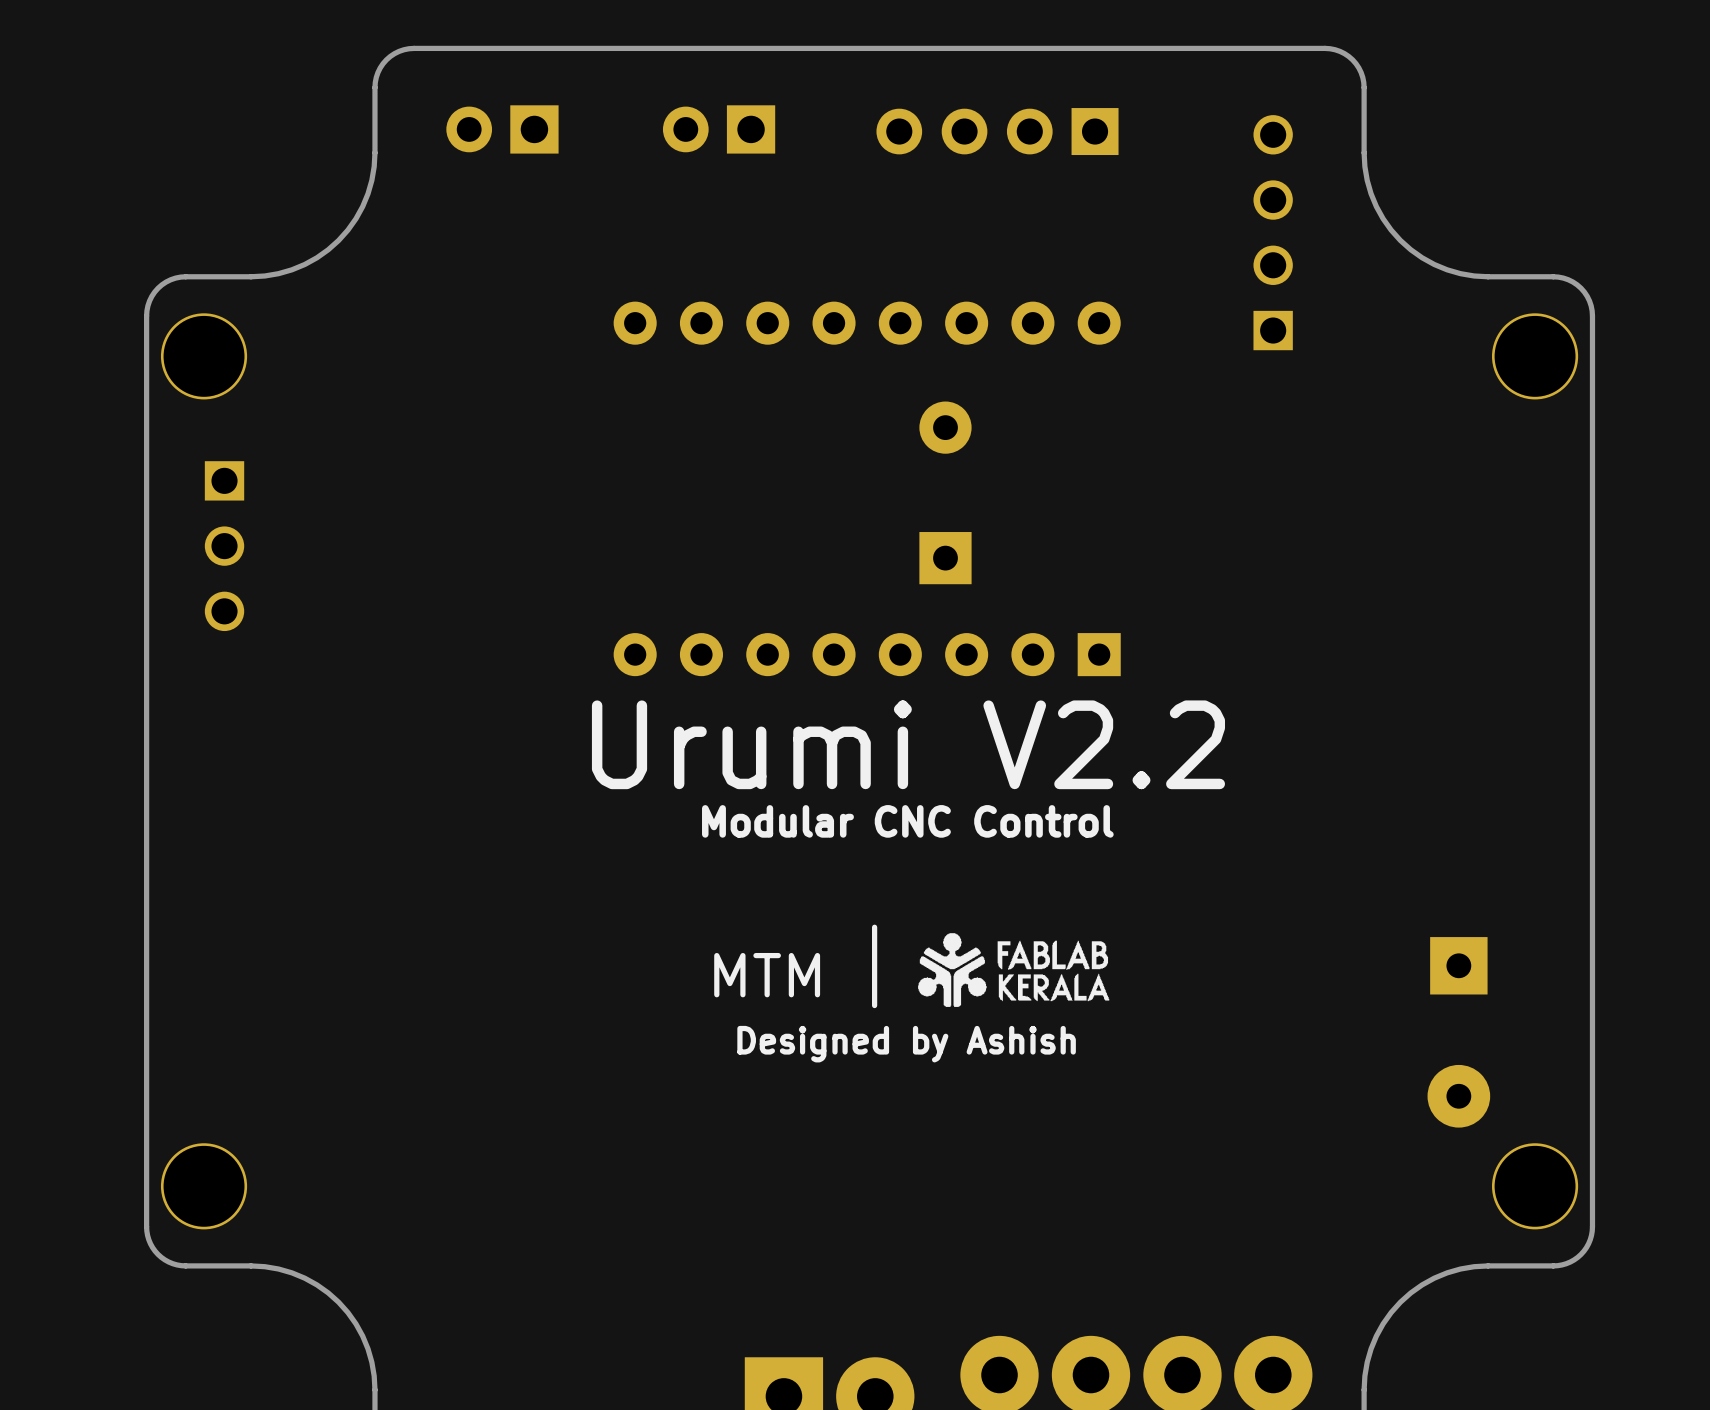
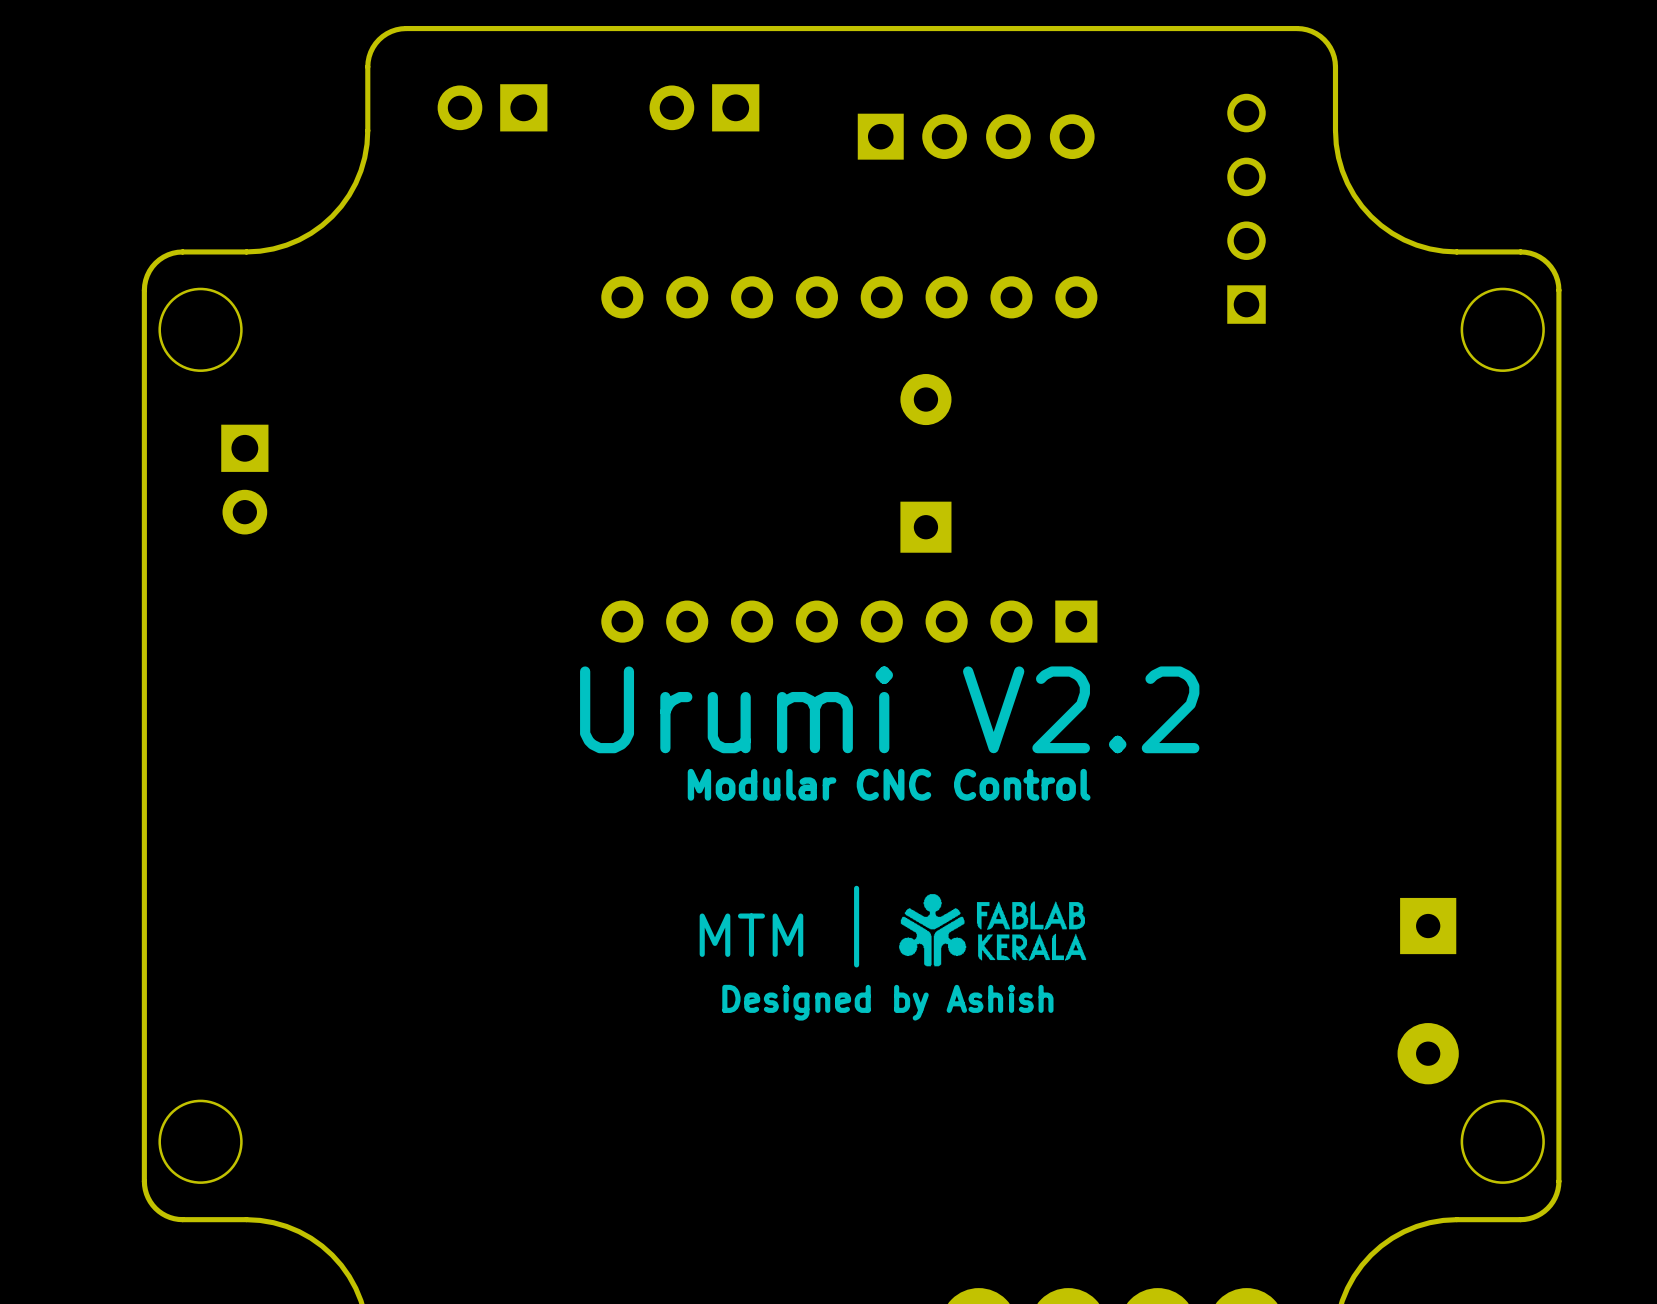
part rotation: 0° (997, 131) -> 180° (976, 136)
part: none -> (244, 479)
part: (224, 546) -> none

